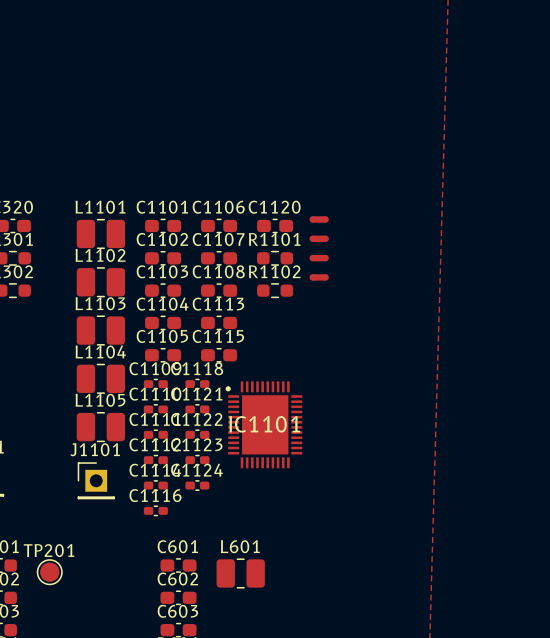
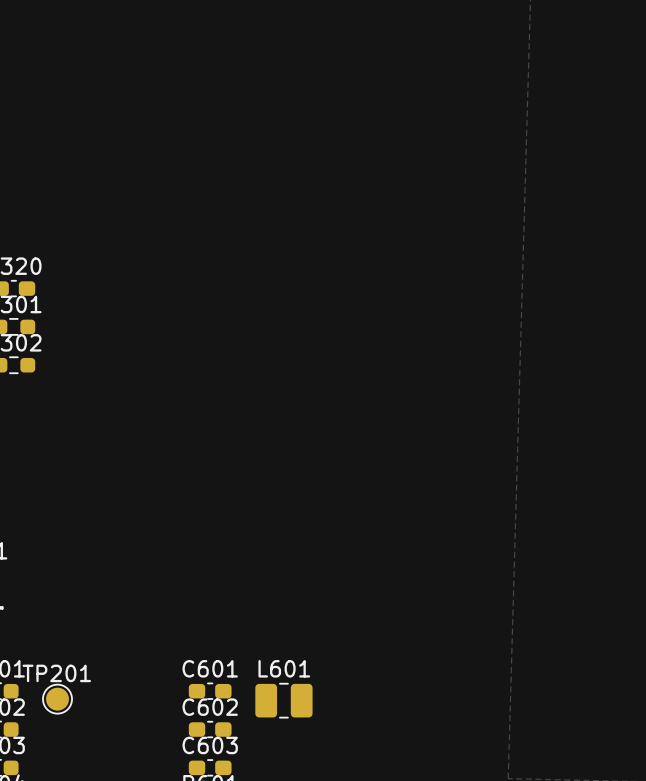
part: (319, 219) -> none
C1101: (163, 225) -> none
C1106: (219, 225) -> none
C1120: (275, 225) -> none
L1101: (100, 233) -> none
part: (319, 238) -> none
C1102: (163, 258) -> none
C1107: (219, 258) -> none
R1101: (275, 258) -> none
part: (319, 258) -> none
part: (319, 277) -> none
L1102: (100, 282) -> none
C1103: (163, 290) -> none
C1108: (219, 290) -> none
R1102: (275, 290) -> none
C1104: (163, 322) -> none
C1113: (219, 322) -> none
L1103: (100, 330) -> none
C1105: (163, 355) -> none
C1115: (219, 355) -> none
L1104: (100, 378) -> none
C1109: (155, 384) -> none
C1118: (197, 384) -> none
C1110: (155, 409) -> none
C1121: (197, 409) -> none
IC1101: (263, 424) -> none
L1105: (100, 427) -> none
C1111: (155, 434) -> none
C1122: (197, 434) -> none
C1112: (155, 460) -> none
C1123: (197, 460) -> none
J1101: (96, 480) -> none
C1114: (155, 485) -> none
C1124: (197, 485) -> none
C1116: (155, 510) -> none

